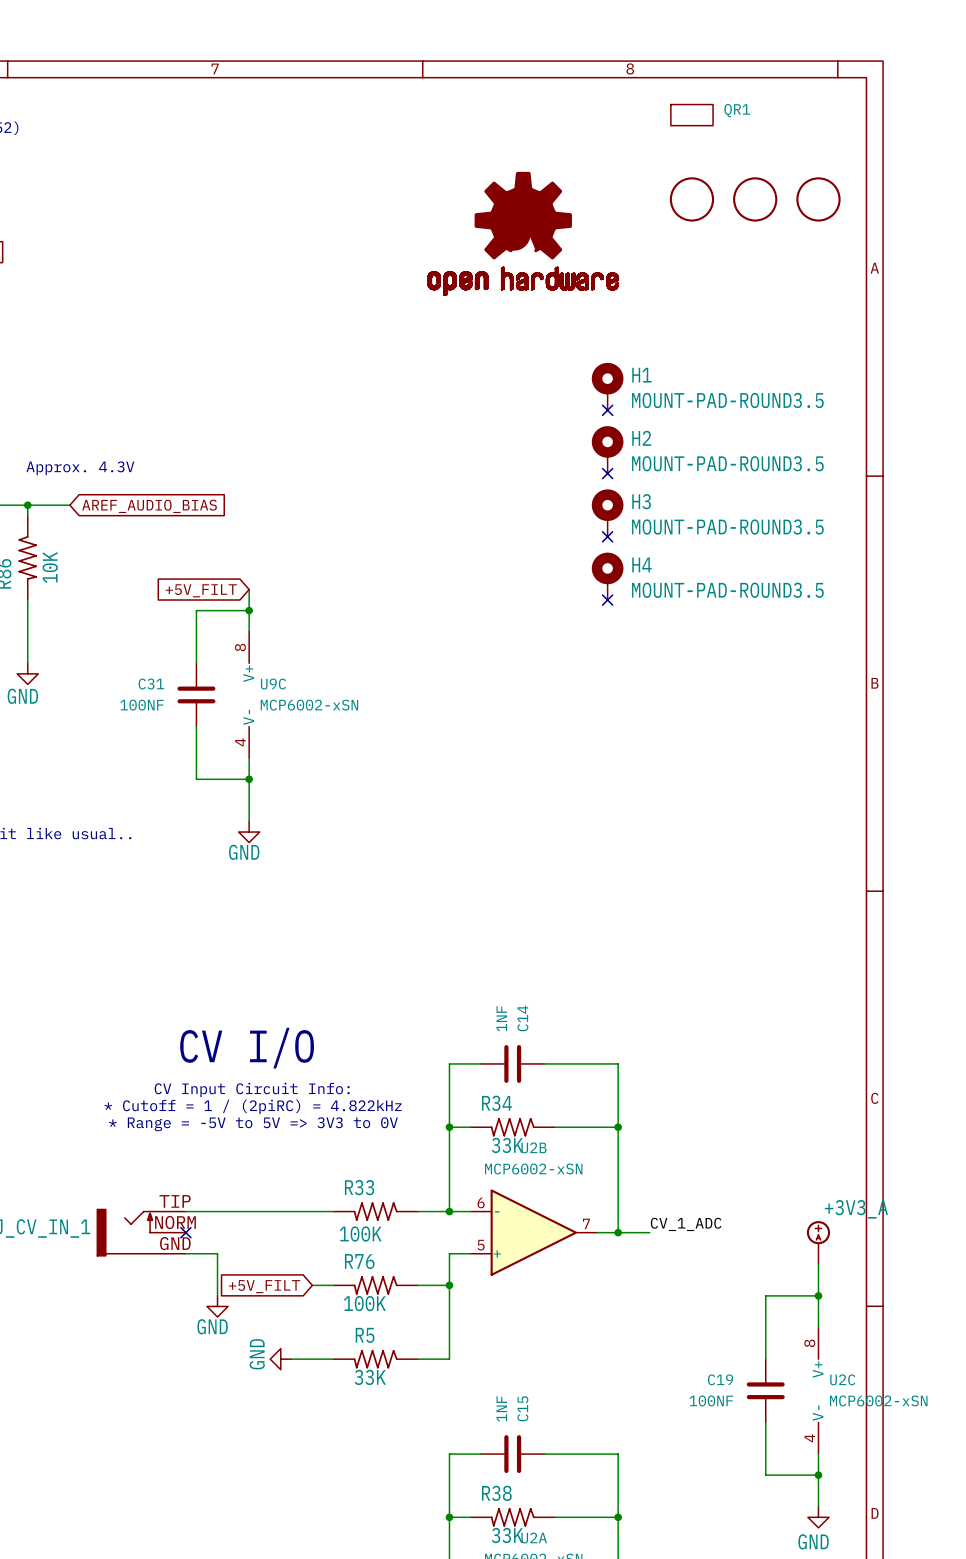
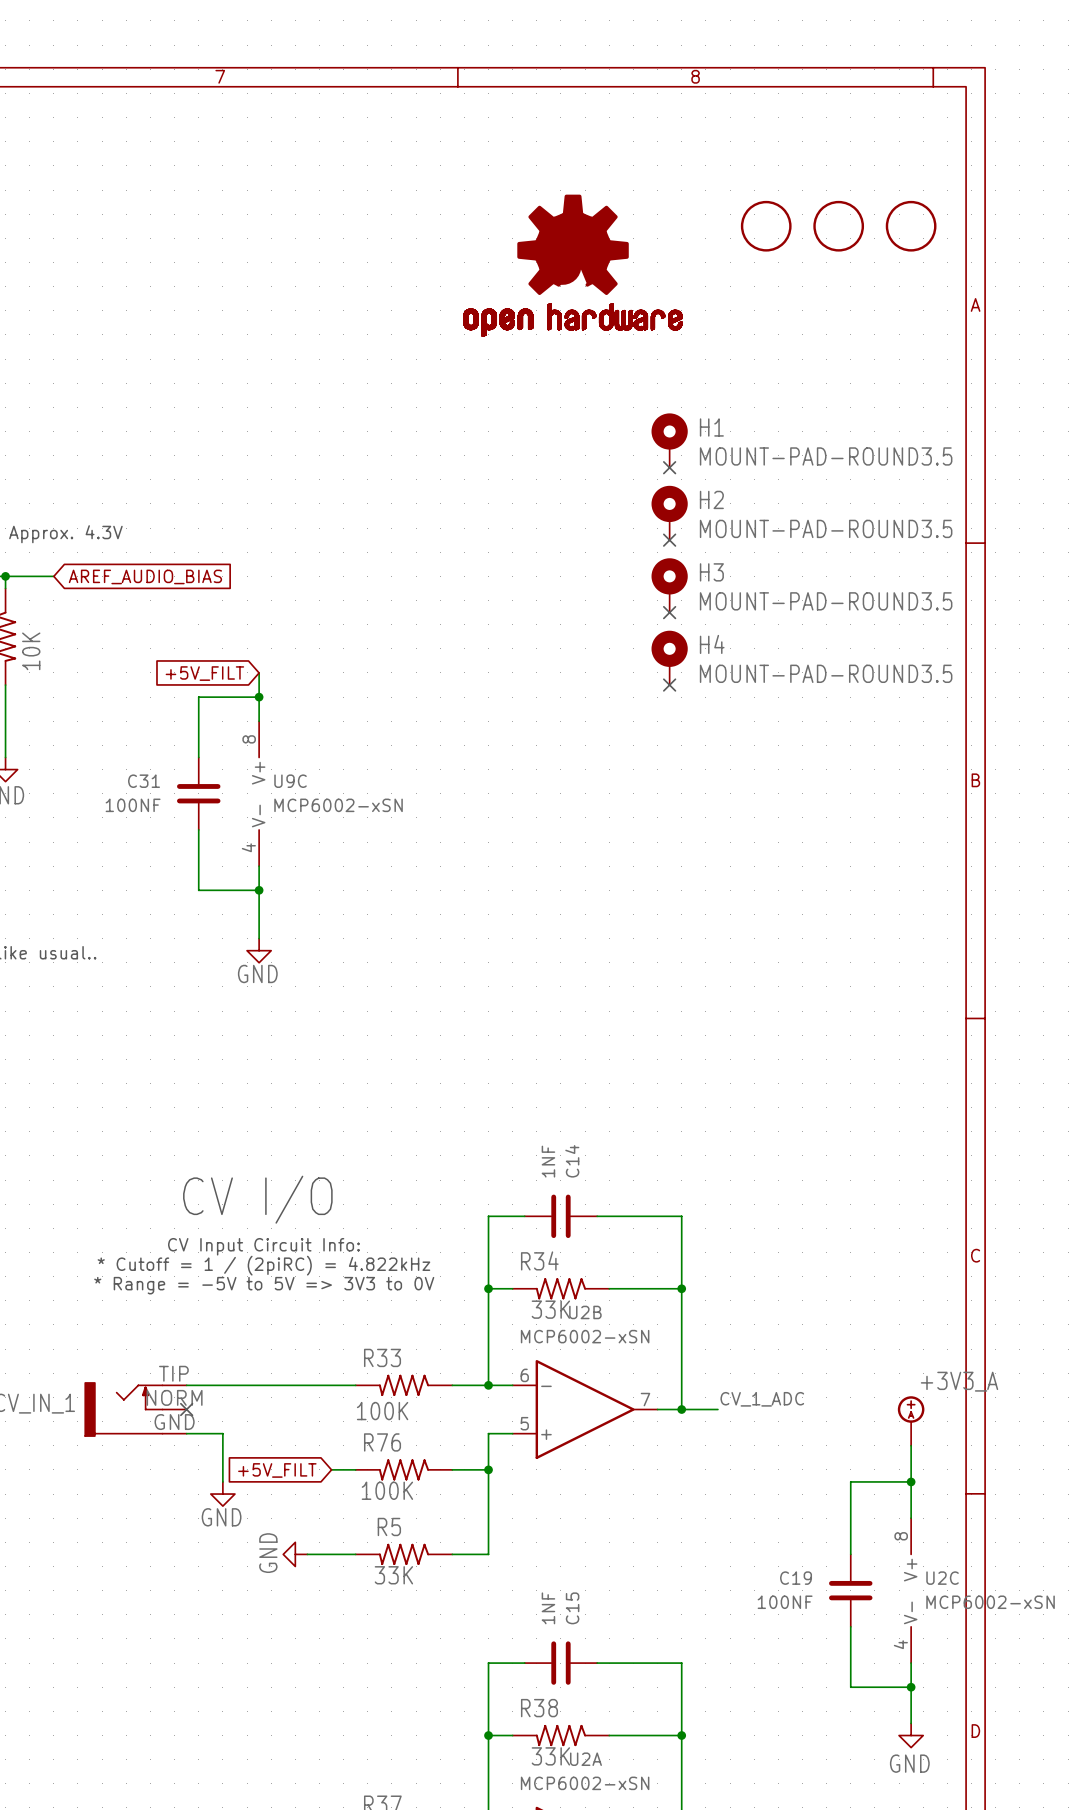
QR1: (691, 115) -> none

